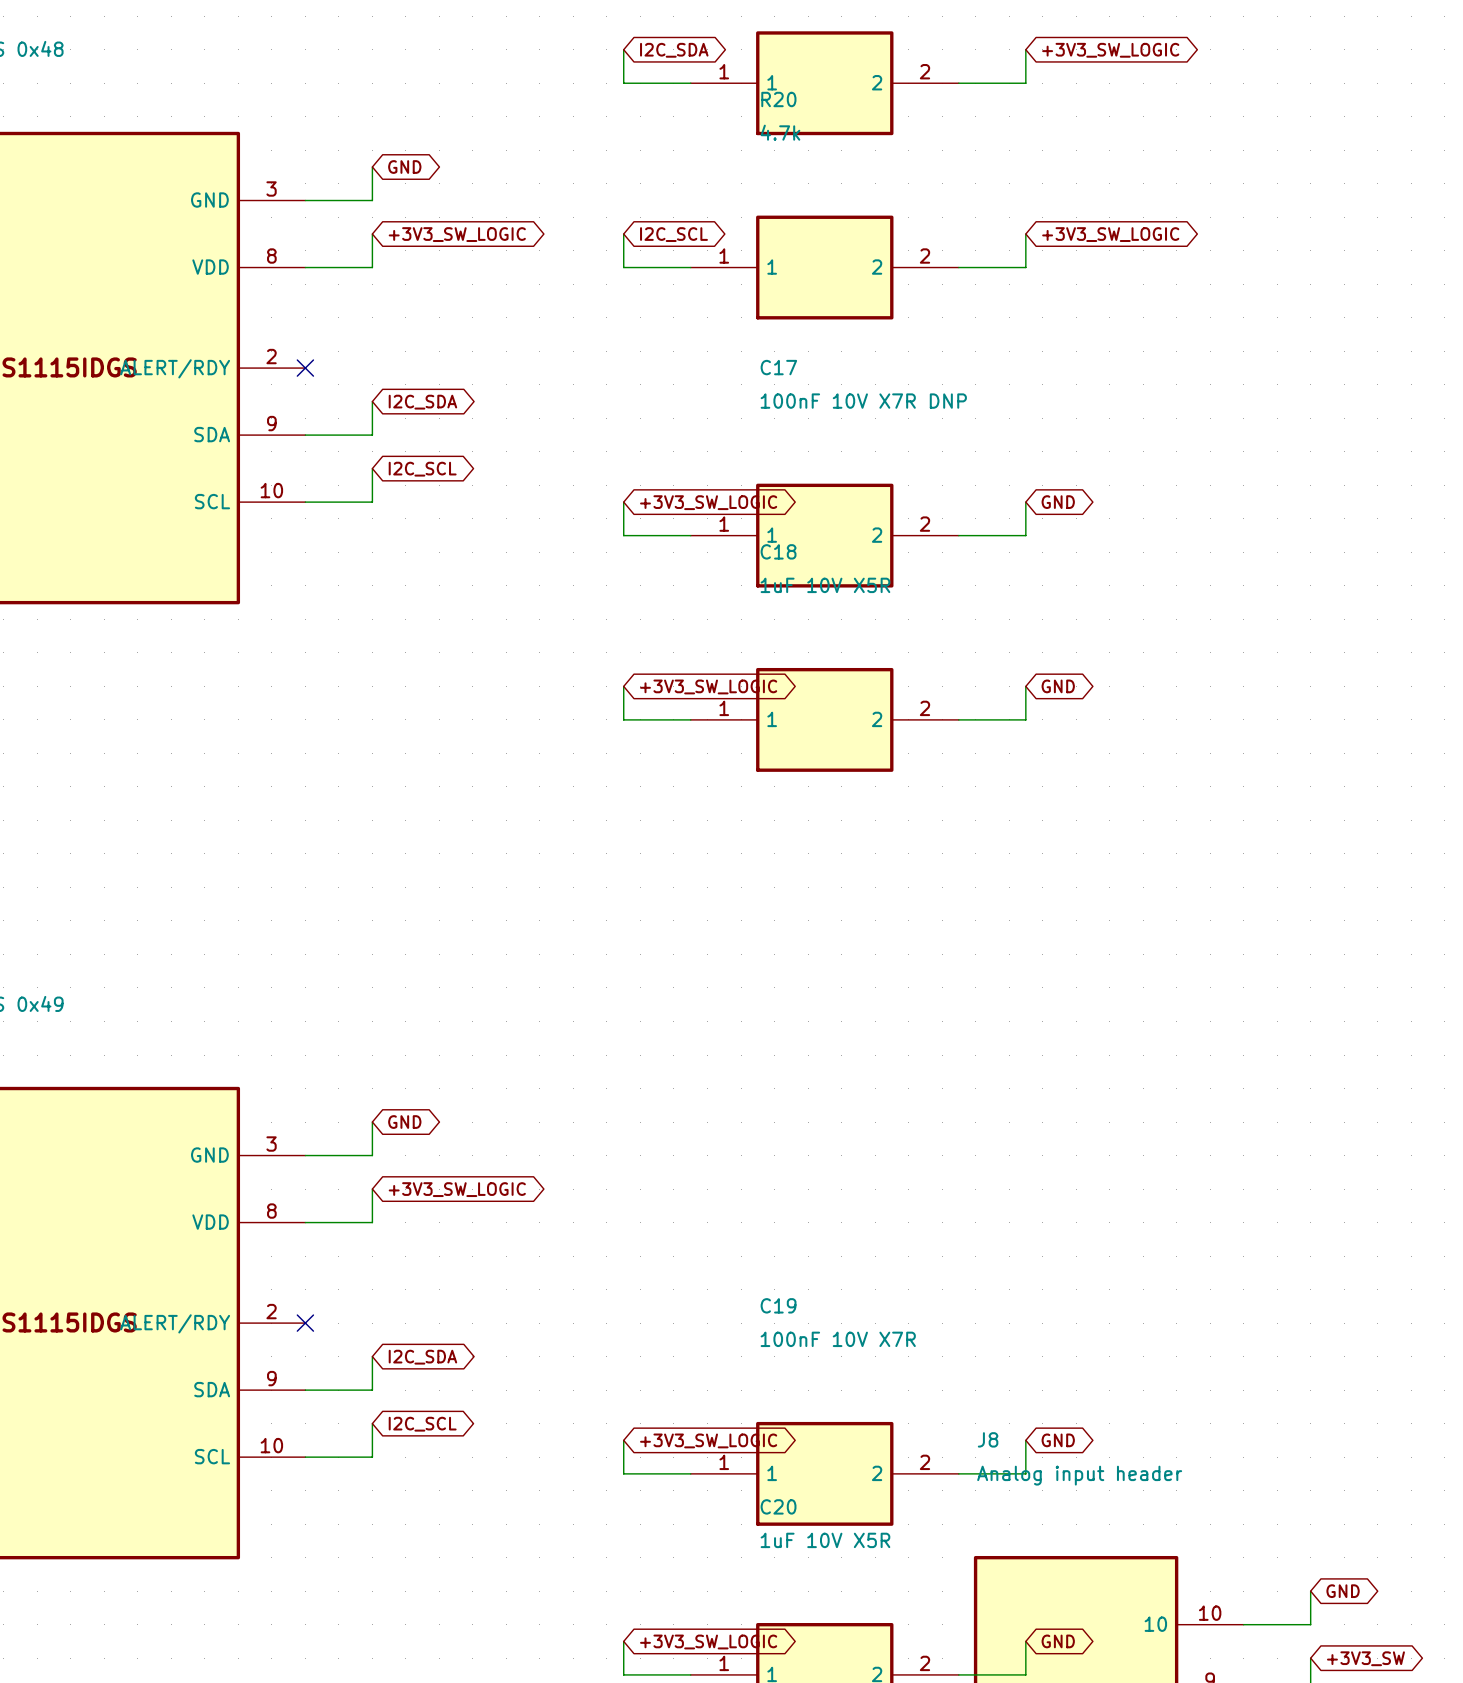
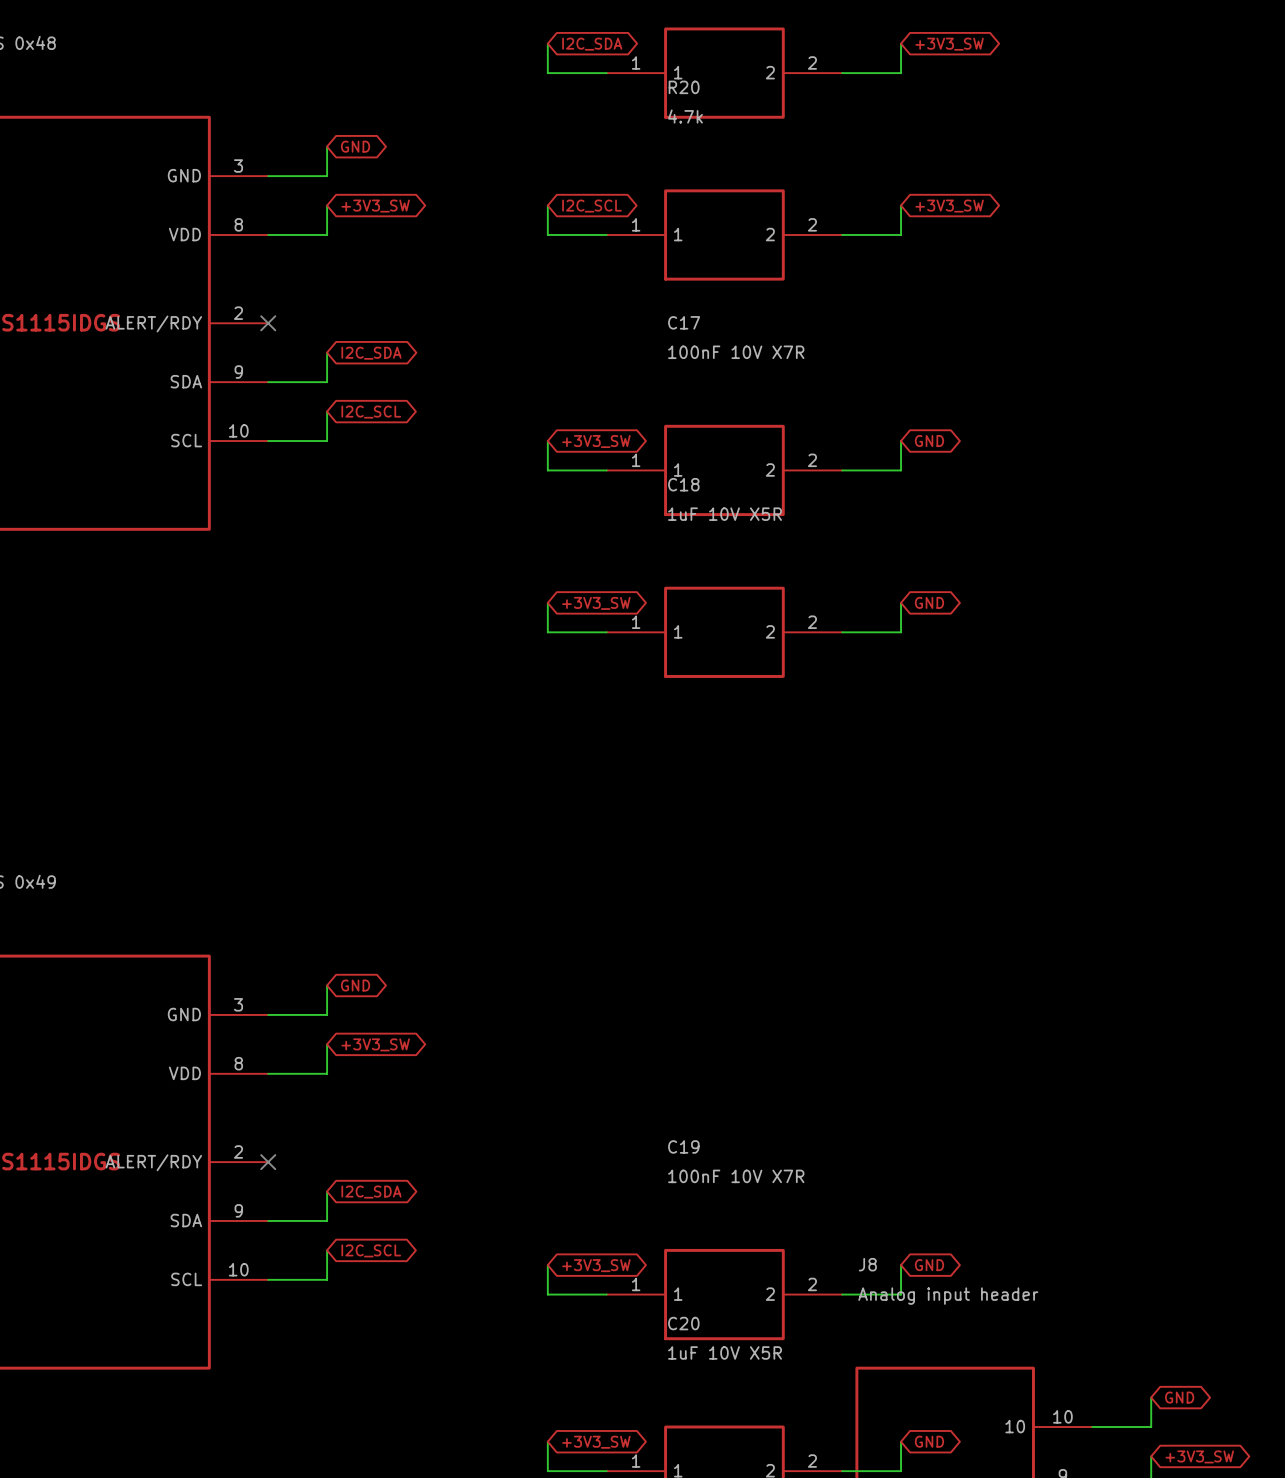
global label: +3V3_SW_LOGIC (1110, 50) -> +3V3_SW (949, 44)
global label: +3V3_SW_LOGIC (457, 234) -> +3V3_SW (375, 206)
global label: +3V3_SW_LOGIC (1110, 234) -> +3V3_SW (949, 206)
C17 value: 100nF 10V X7R DNP (863, 401) -> 100nF 10V X7R (736, 352)
global label: +3V3_SW_LOGIC (708, 502) -> +3V3_SW (596, 441)
global label: +3V3_SW_LOGIC (708, 686) -> +3V3_SW (596, 603)
global label: +3V3_SW_LOGIC (457, 1189) -> +3V3_SW (375, 1044)
global label: +3V3_SW_LOGIC (708, 1440) -> +3V3_SW (596, 1265)
global label: +3V3_SW_LOGIC (708, 1641) -> +3V3_SW (596, 1442)

